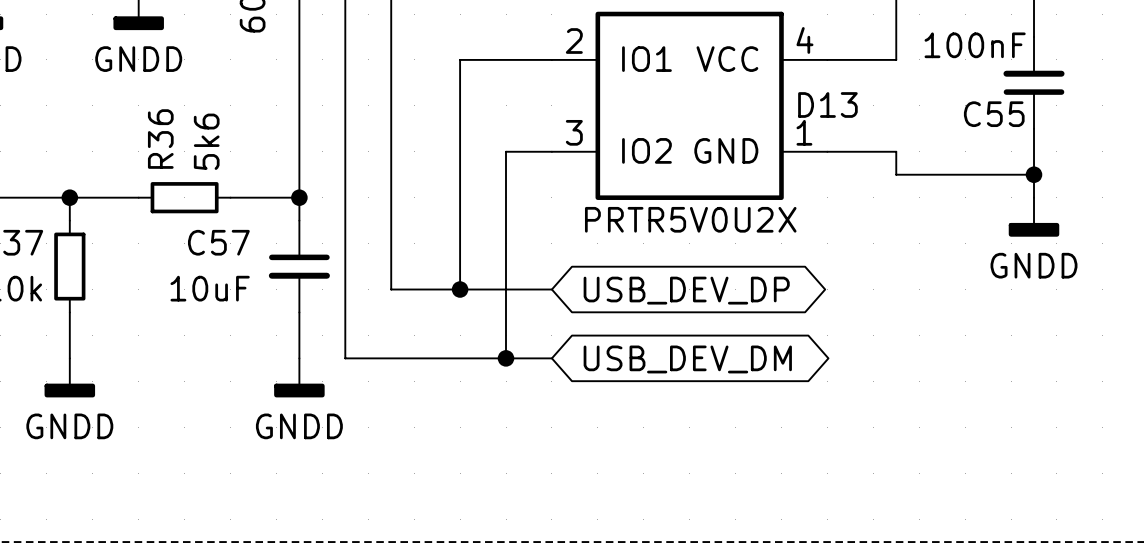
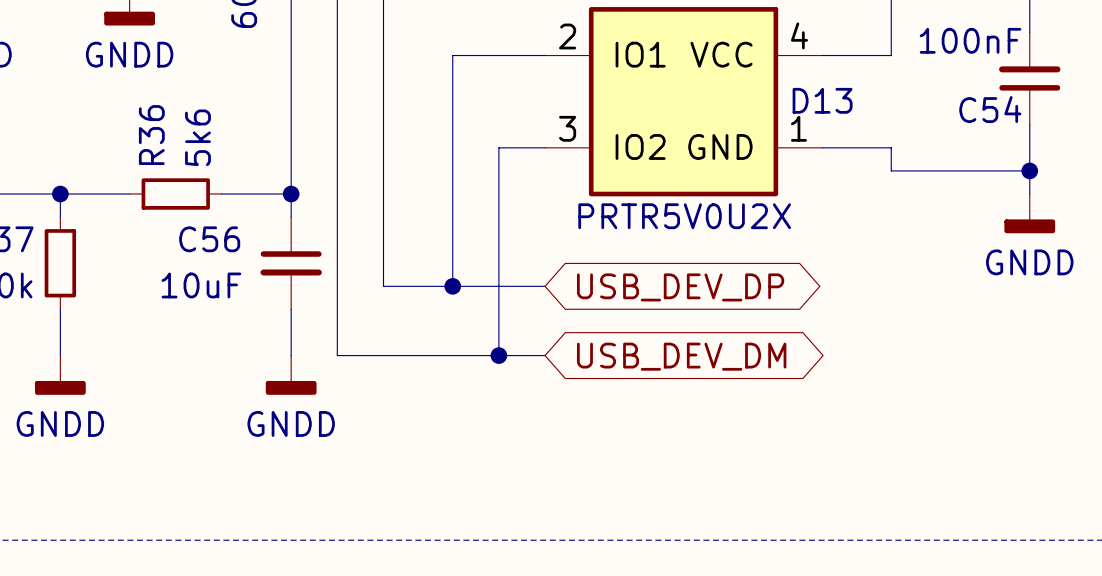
C55 name: C55 (994, 114) -> C54 (990, 109)
C57 name: C57 (218, 242) -> C56 (209, 239)

